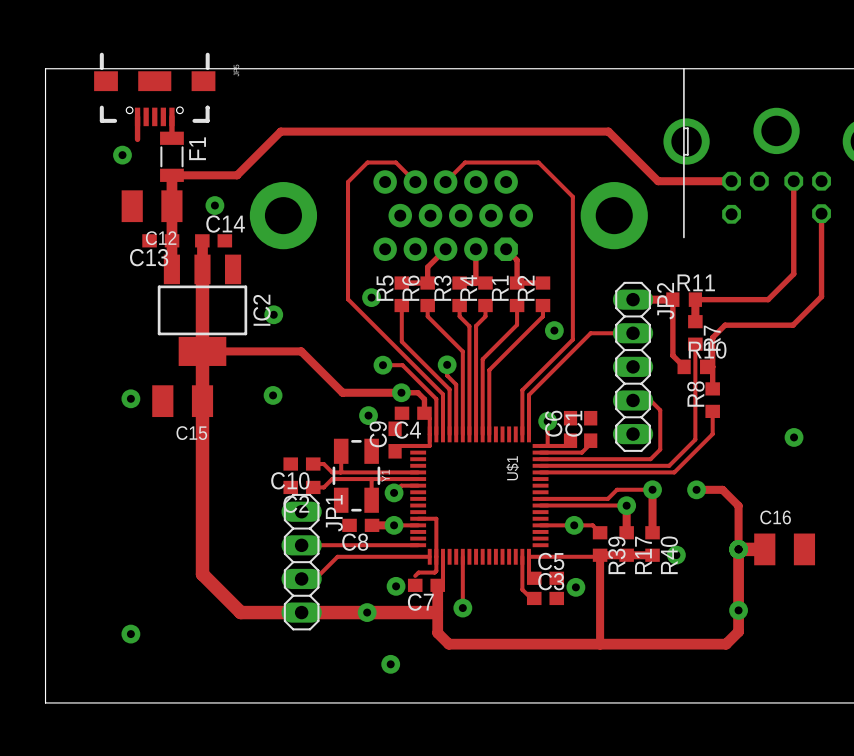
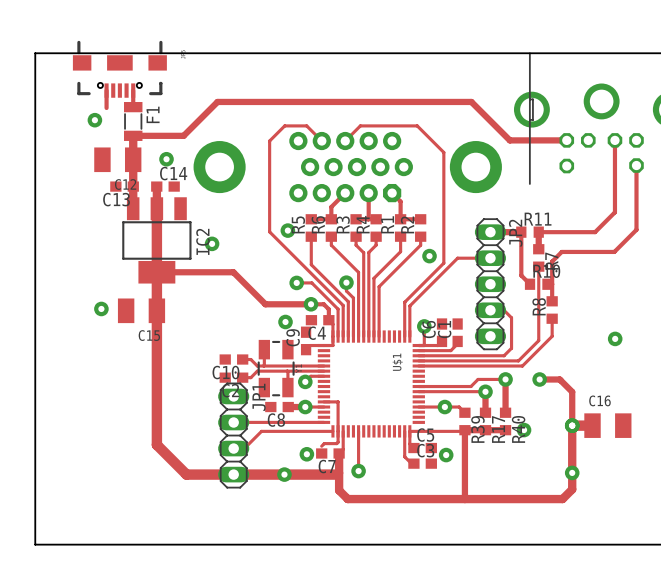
via: (273, 395) -> none
via: (130, 634) -> none
via: (390, 664) -> none

